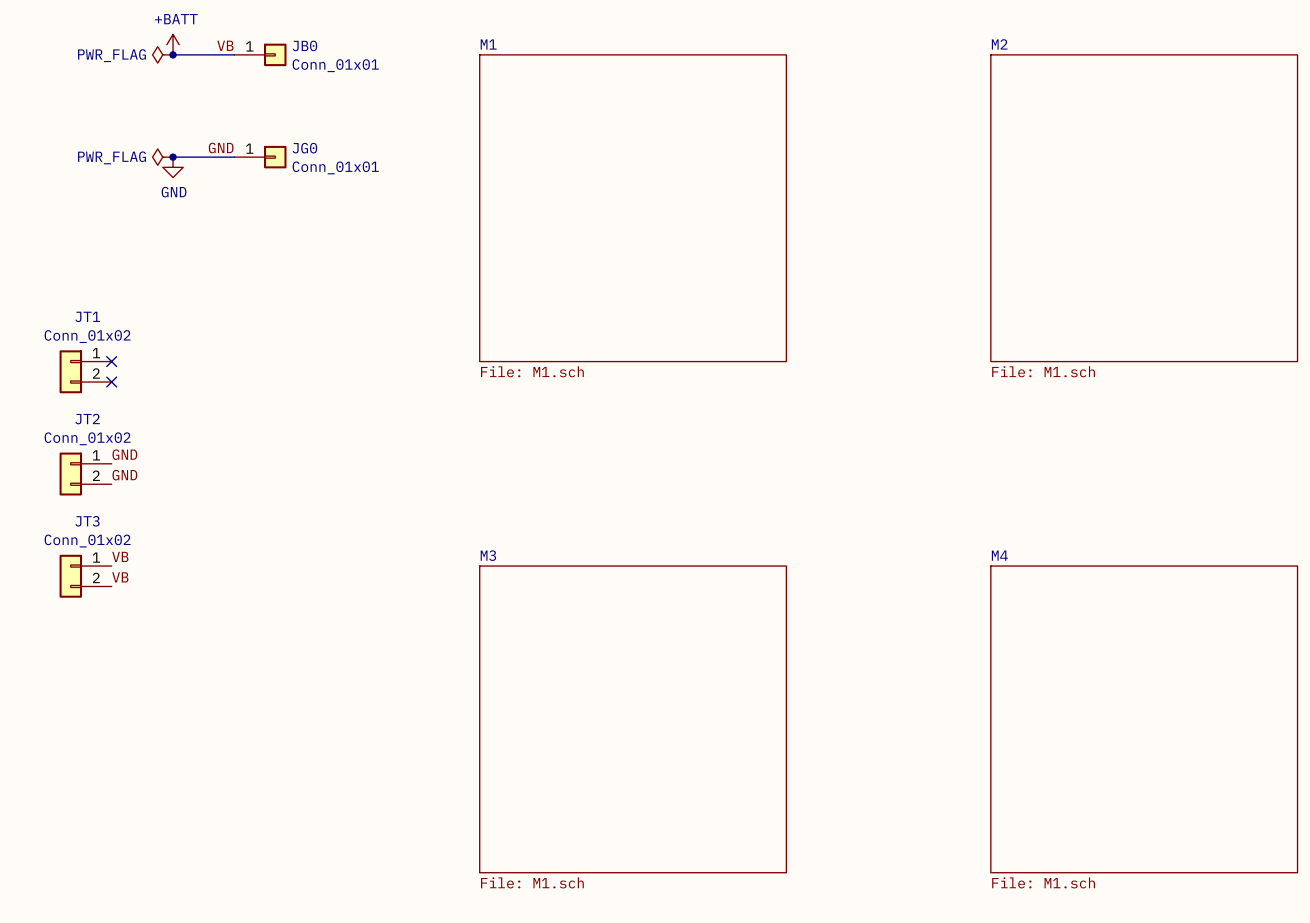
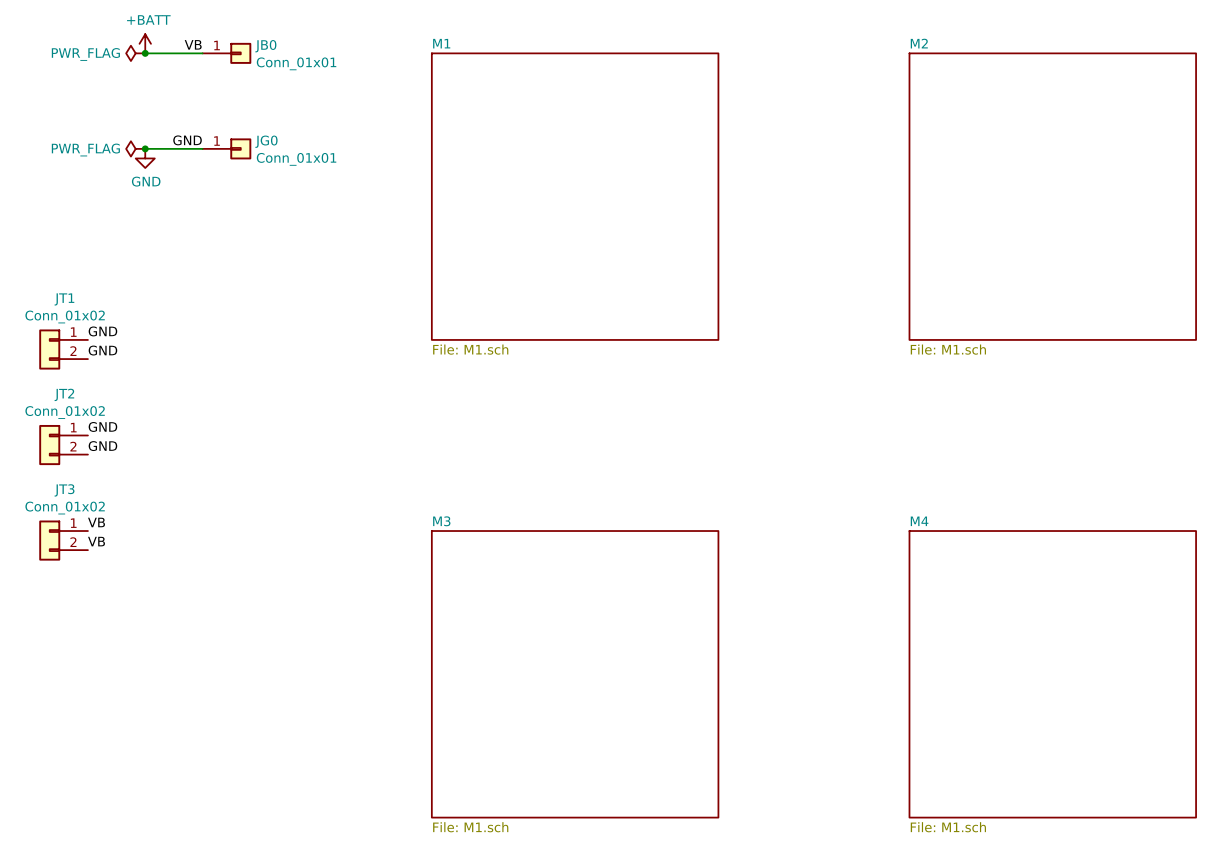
label: none -> GND (102, 331)
no-connect mark: (111, 361) -> none
label: none -> GND (102, 350)
no-connect mark: (111, 382) -> none

